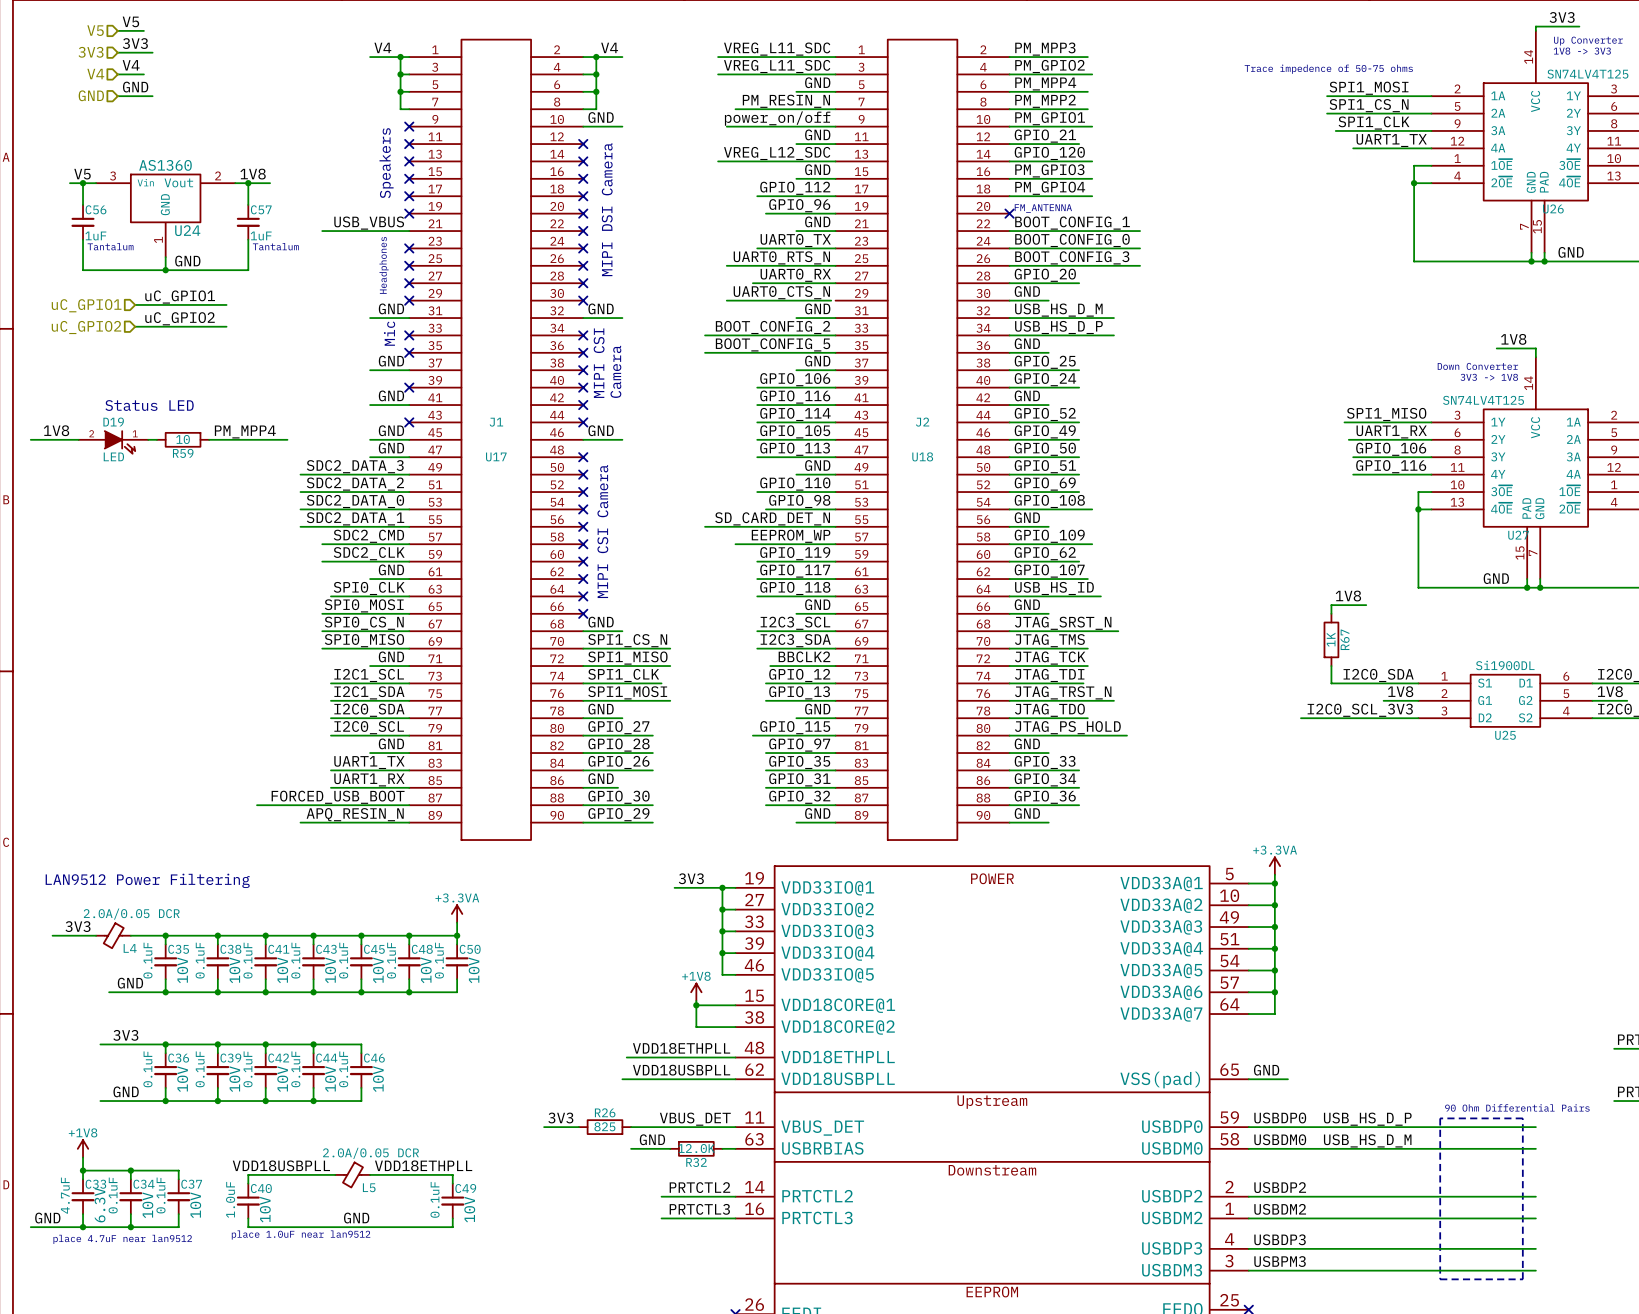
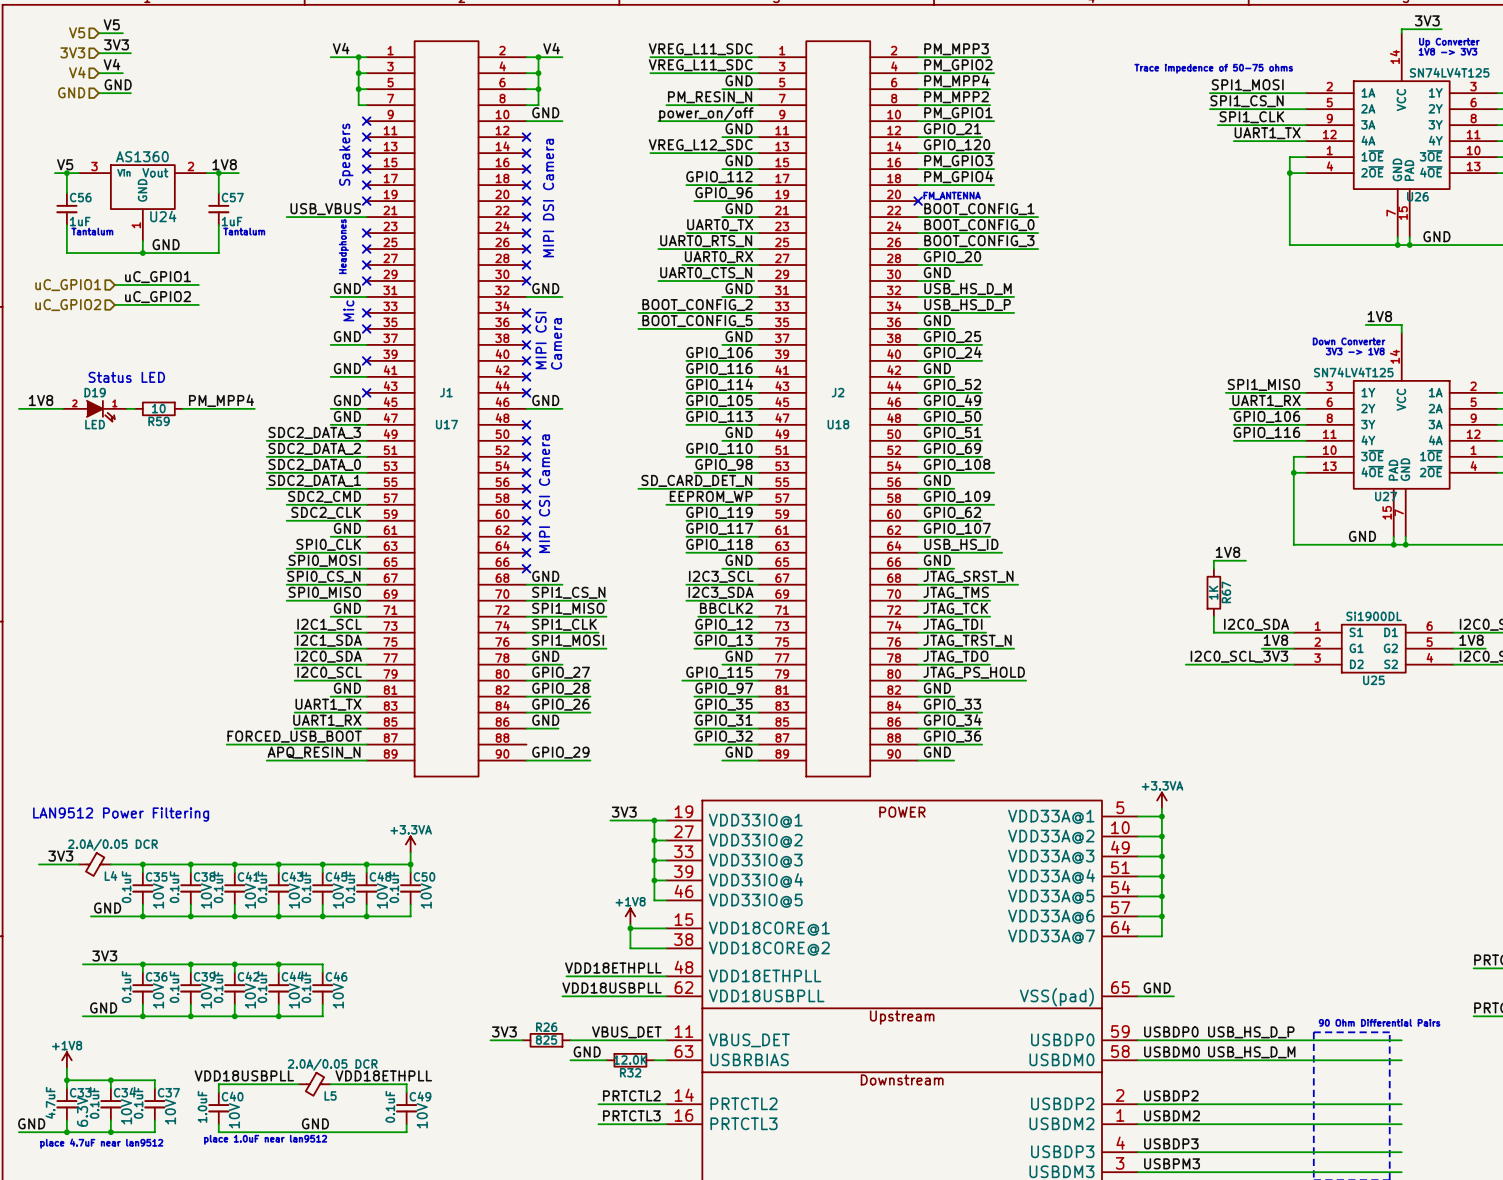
label: GPIO_30 (619, 797) -> none
wire: (583, 805) (652, 805) -> none

